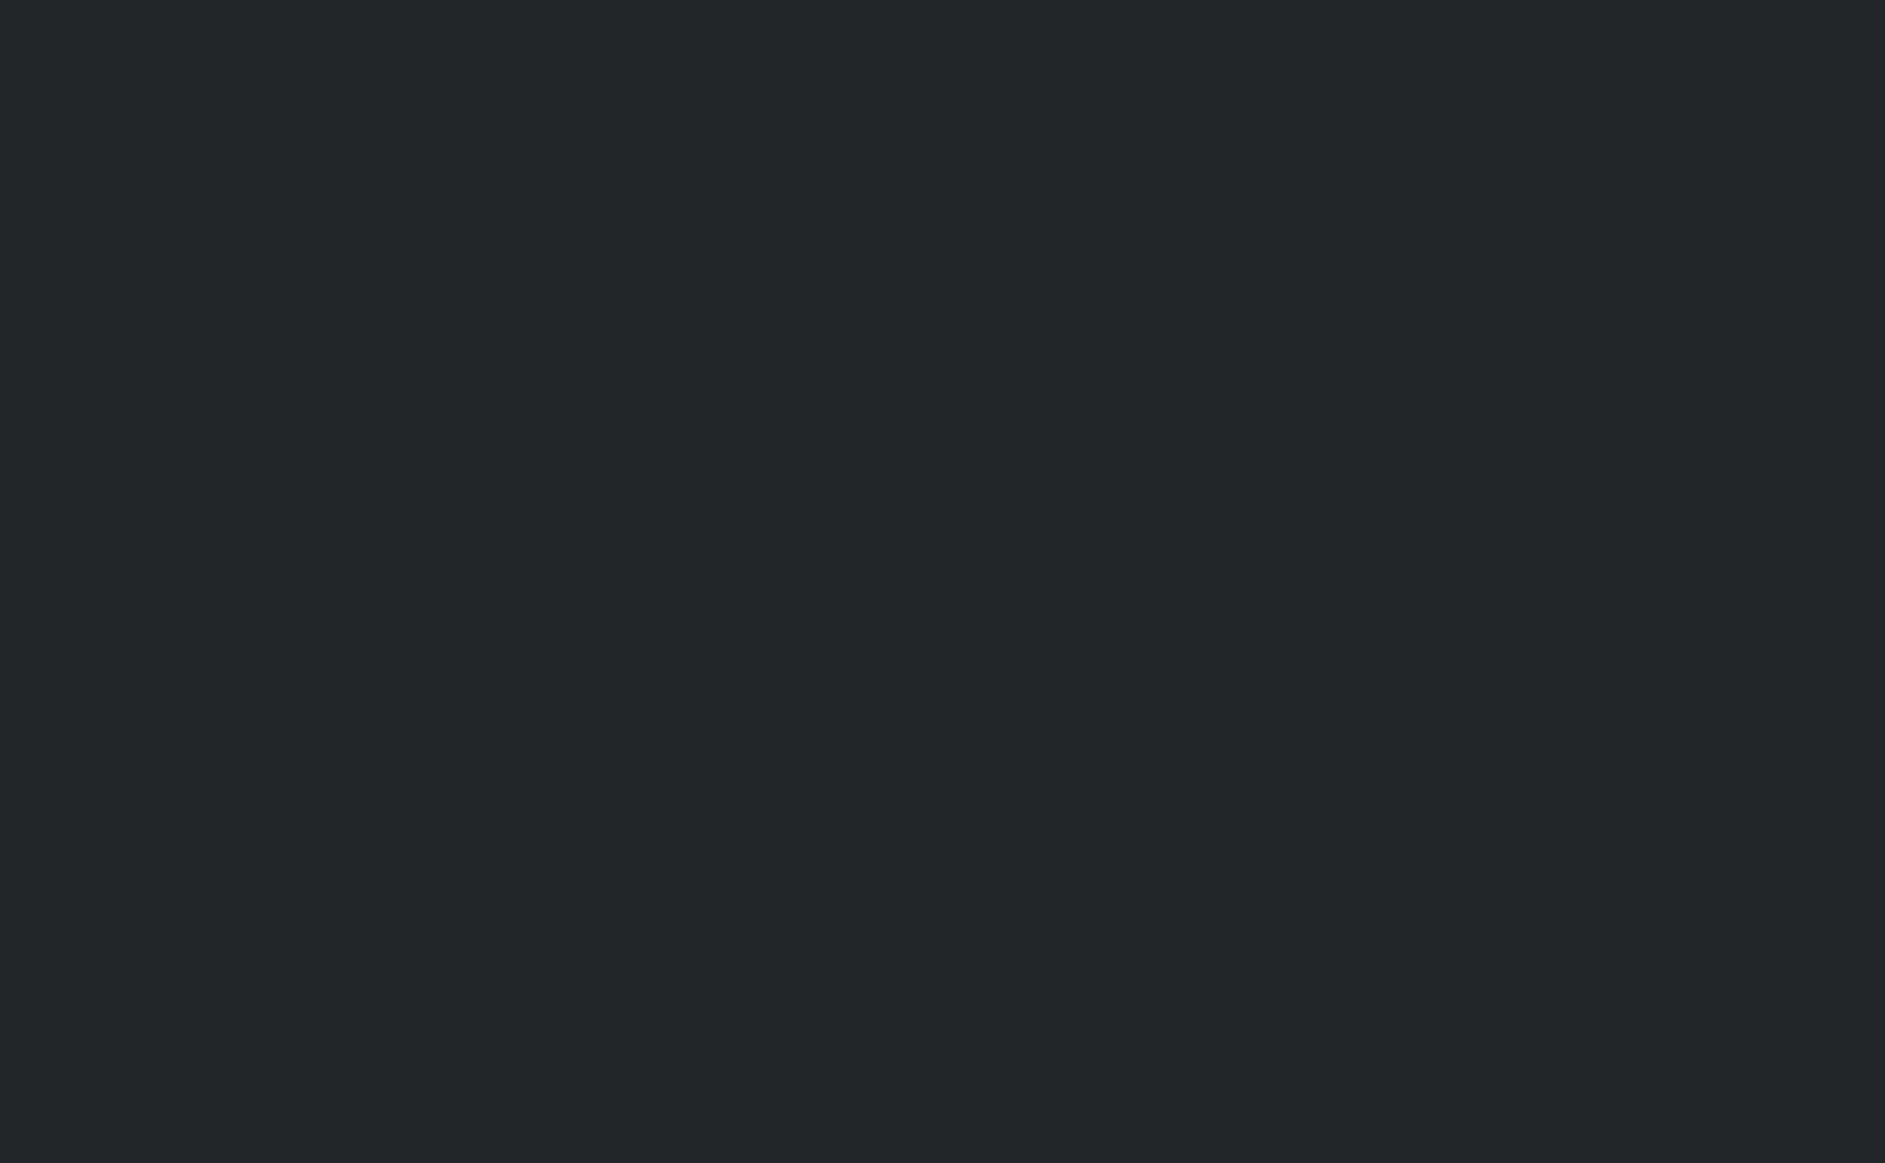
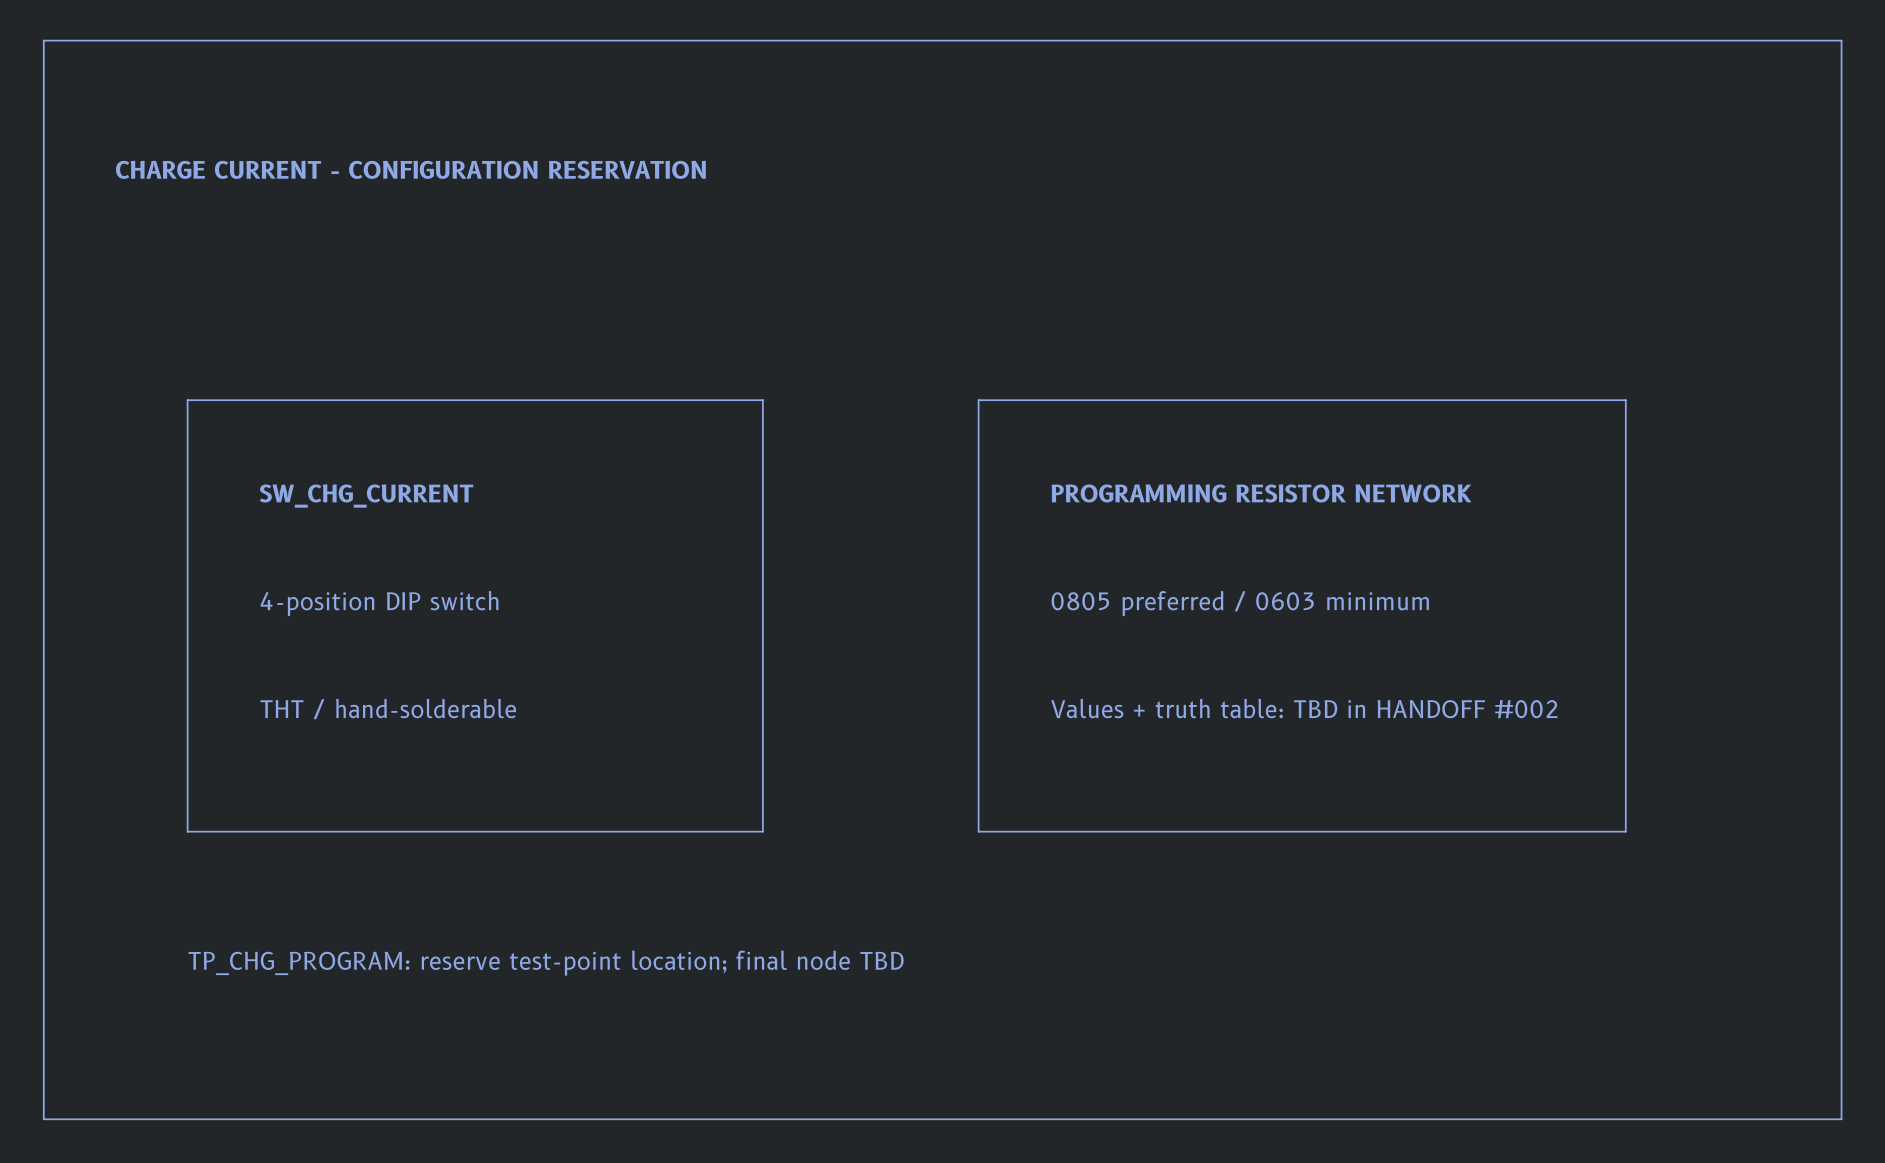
line: none -> (43, 40) (1841, 40) (1841, 1119) (43, 1119) (43, 40)
text: none -> CHARGE CURRENT - CONFIGURATION RESERVATION (410, 169)
line: none -> (187, 400) (762, 400) (762, 831) (187, 831) (187, 400)
line: none -> (978, 400) (1625, 400) (1625, 831) (978, 831) (978, 400)
text: none -> PROGRAMMING RESISTOR NETWORK (1261, 493)
text: none -> SW_CHG_CURRENT (366, 496)
text: none -> 4-position DIP switch (379, 603)
text: none -> 0805 preferred / 0603 minimum (1240, 603)
text: none -> Values + truth table: TBD in HANDOFF #002 (1304, 708)
text: none -> THT / hand-solderable (388, 709)
text: none -> TP_CHG_PROGRAM: reserve test-point location; final node TBD (546, 963)

